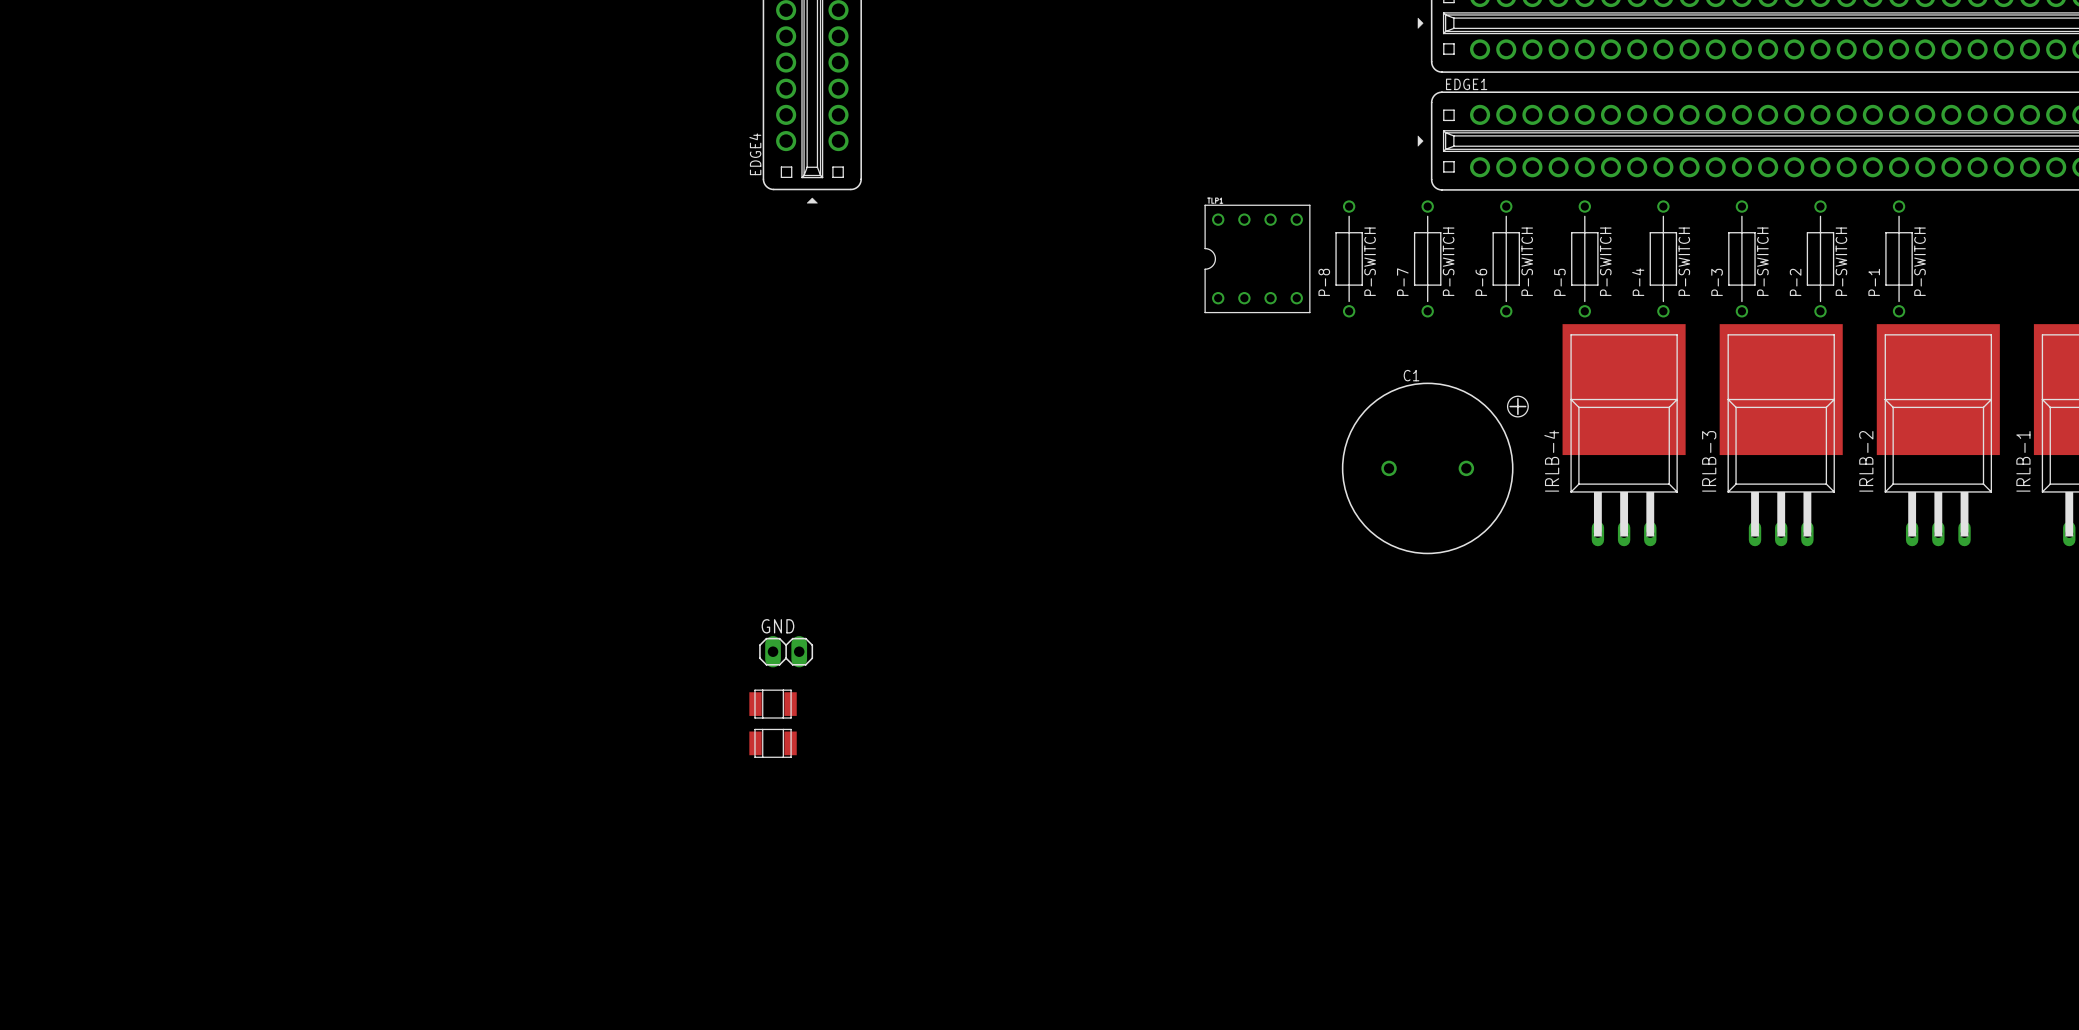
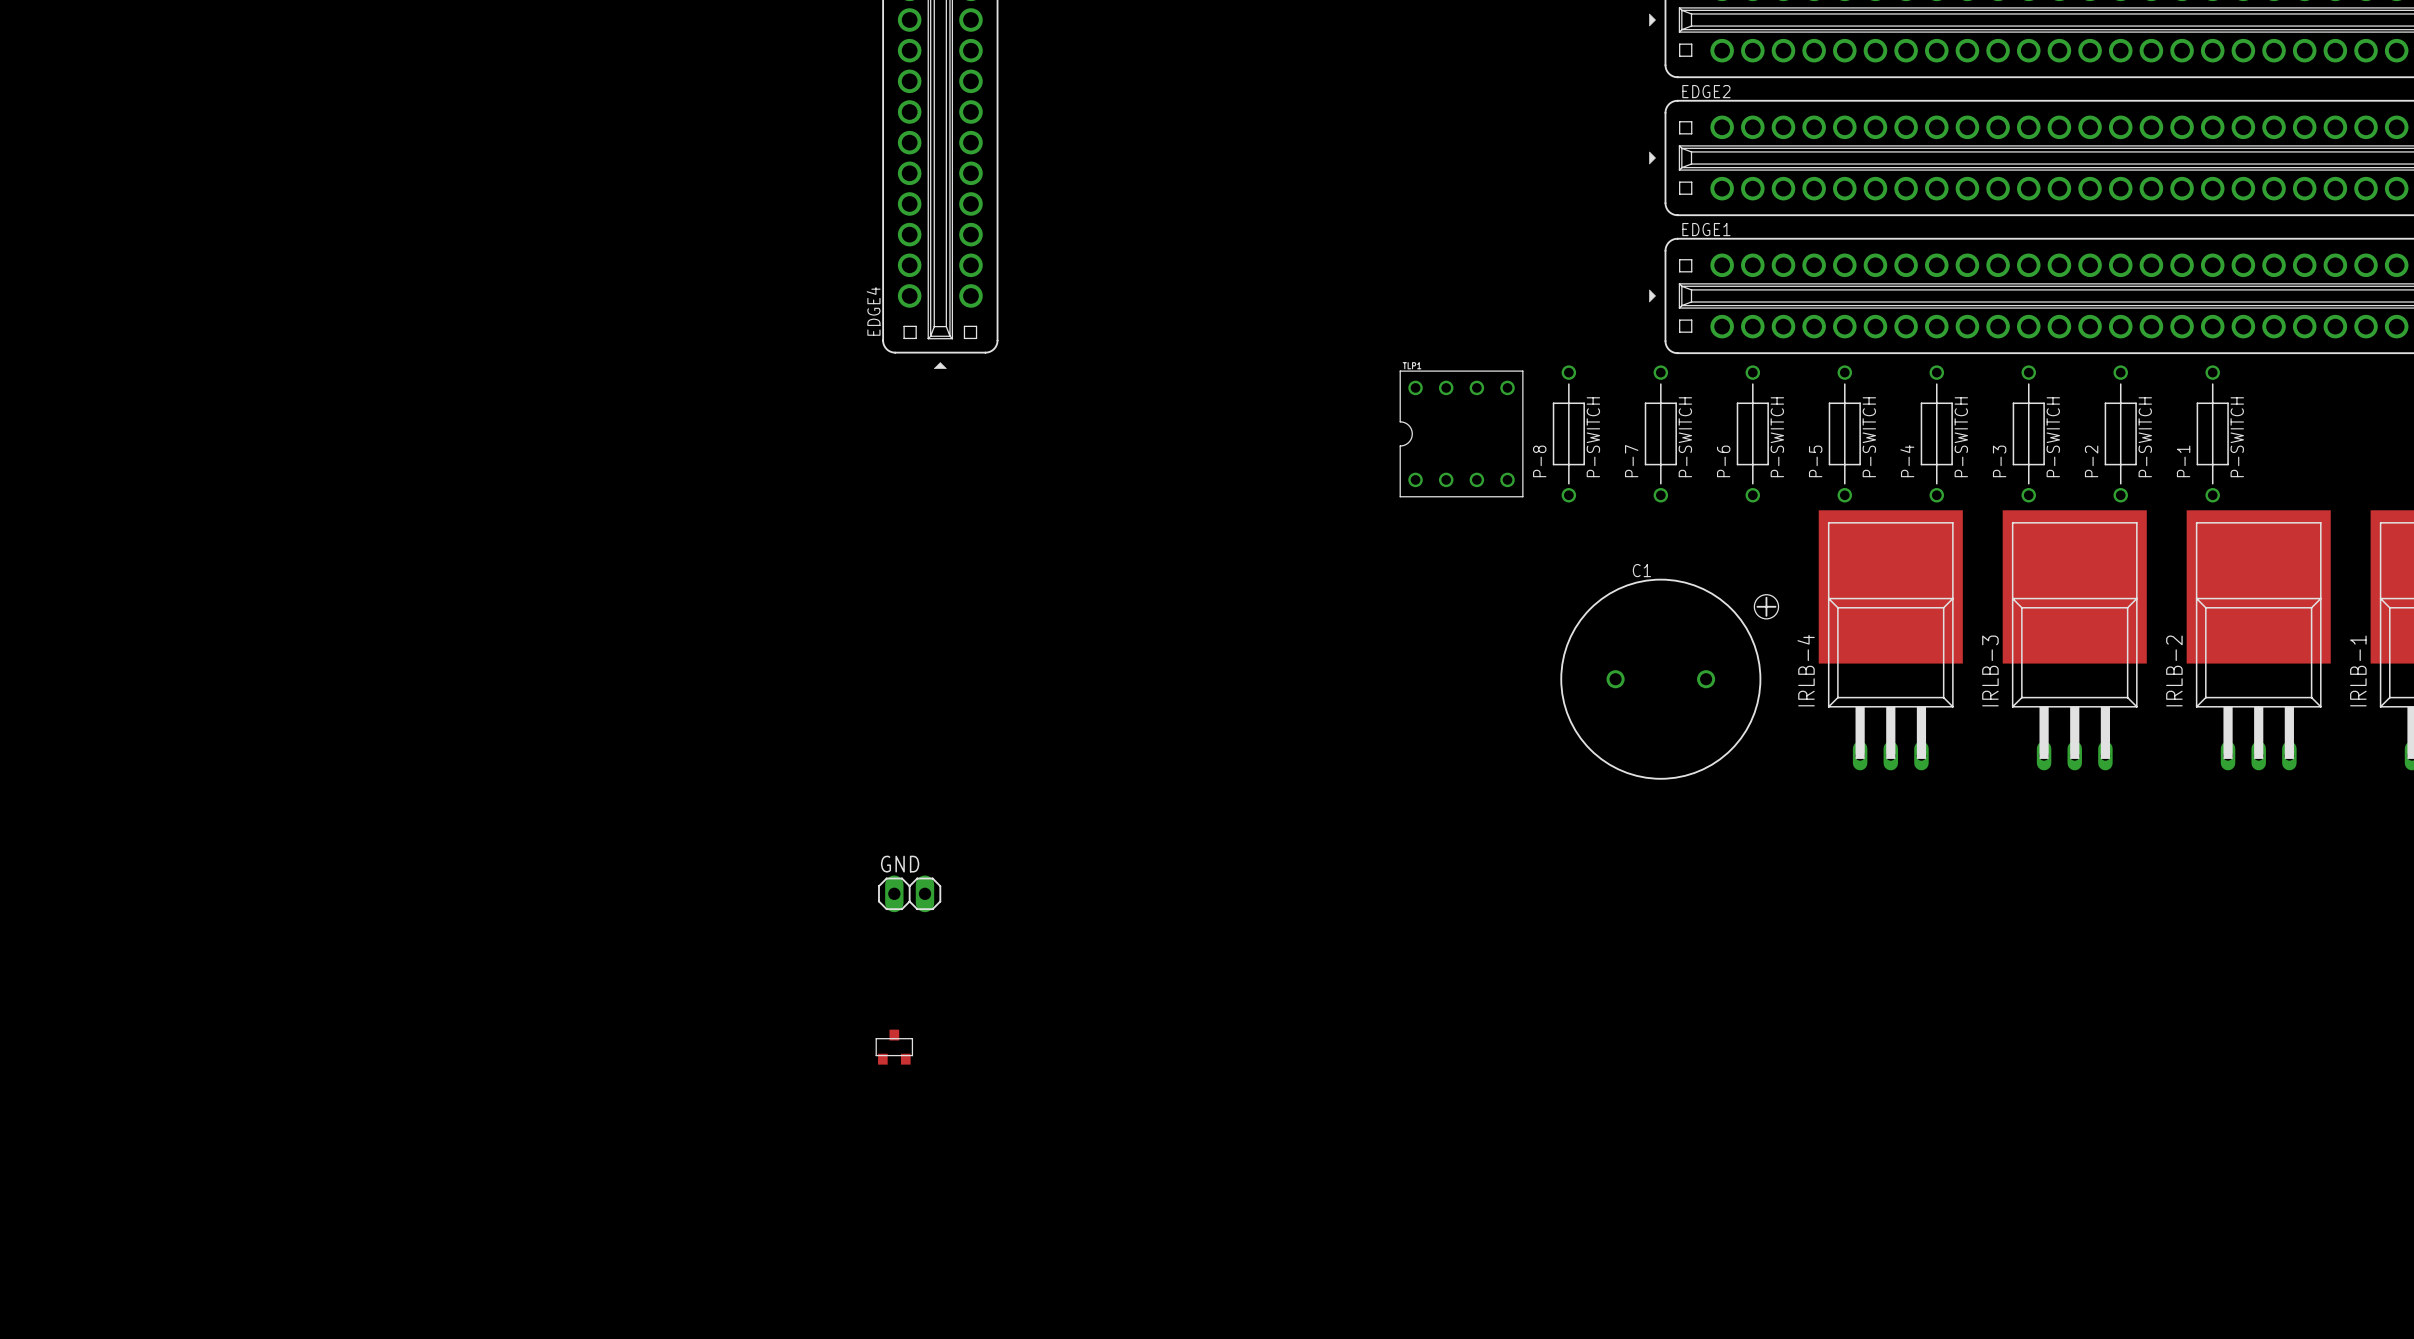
part: (773, 704) -> none
part: (773, 743) -> none
part: none -> (894, 1047)

